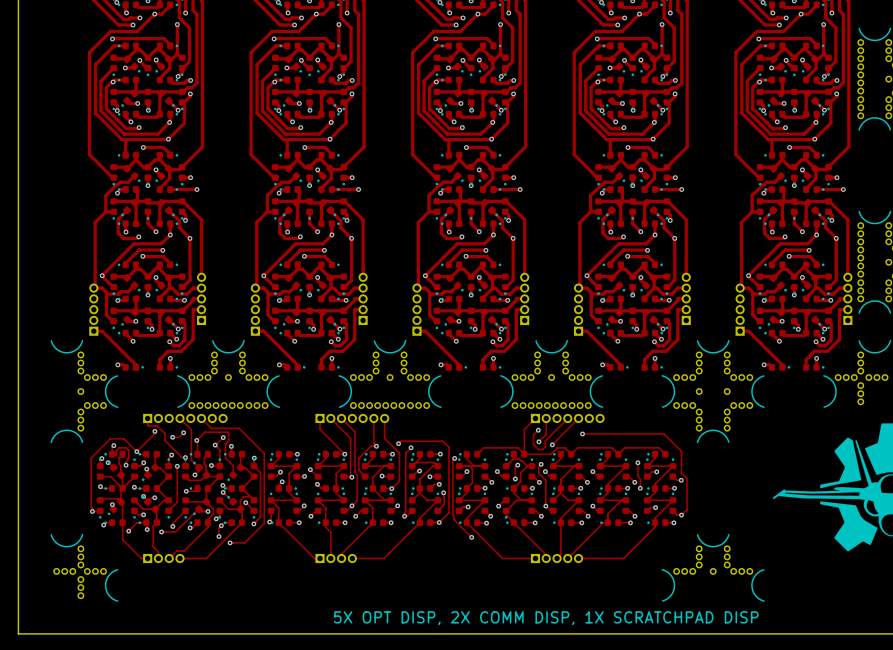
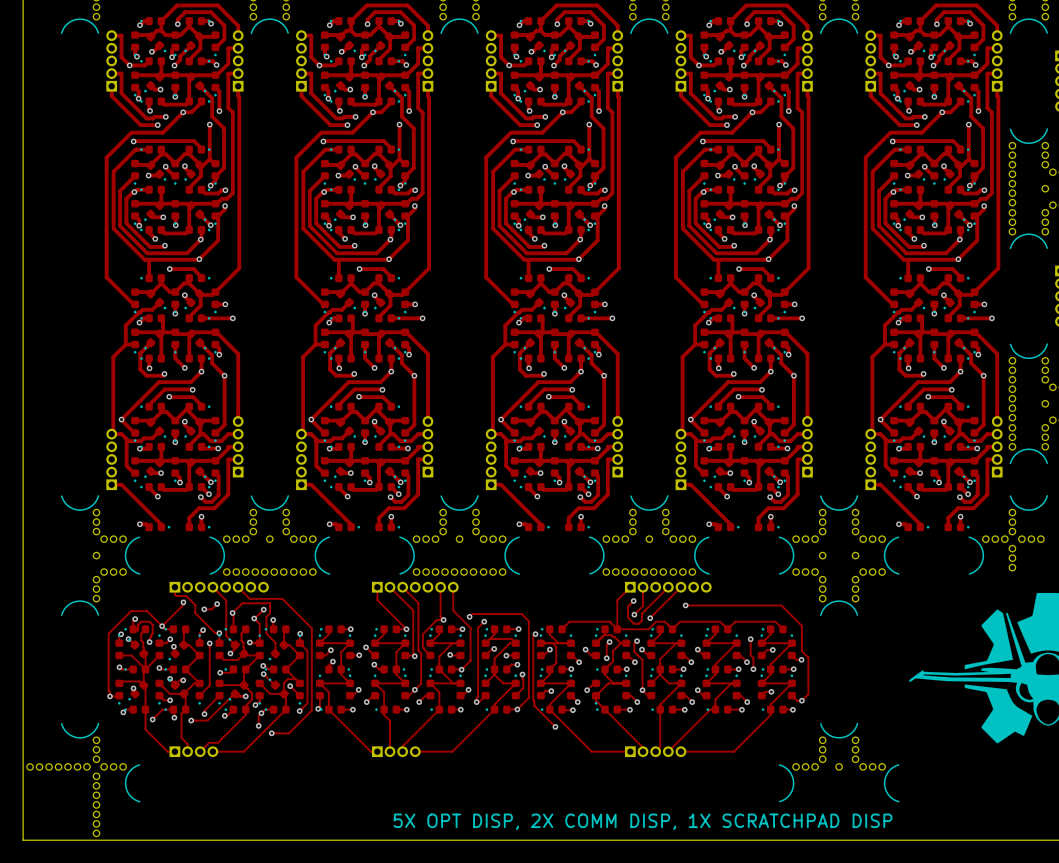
part: none -> (30, 766)
part: none -> (39, 766)
part: none -> (49, 766)
part: none -> (58, 766)
part: none -> (96, 804)
part: none -> (96, 814)
part: none -> (96, 823)
part: none -> (96, 833)

